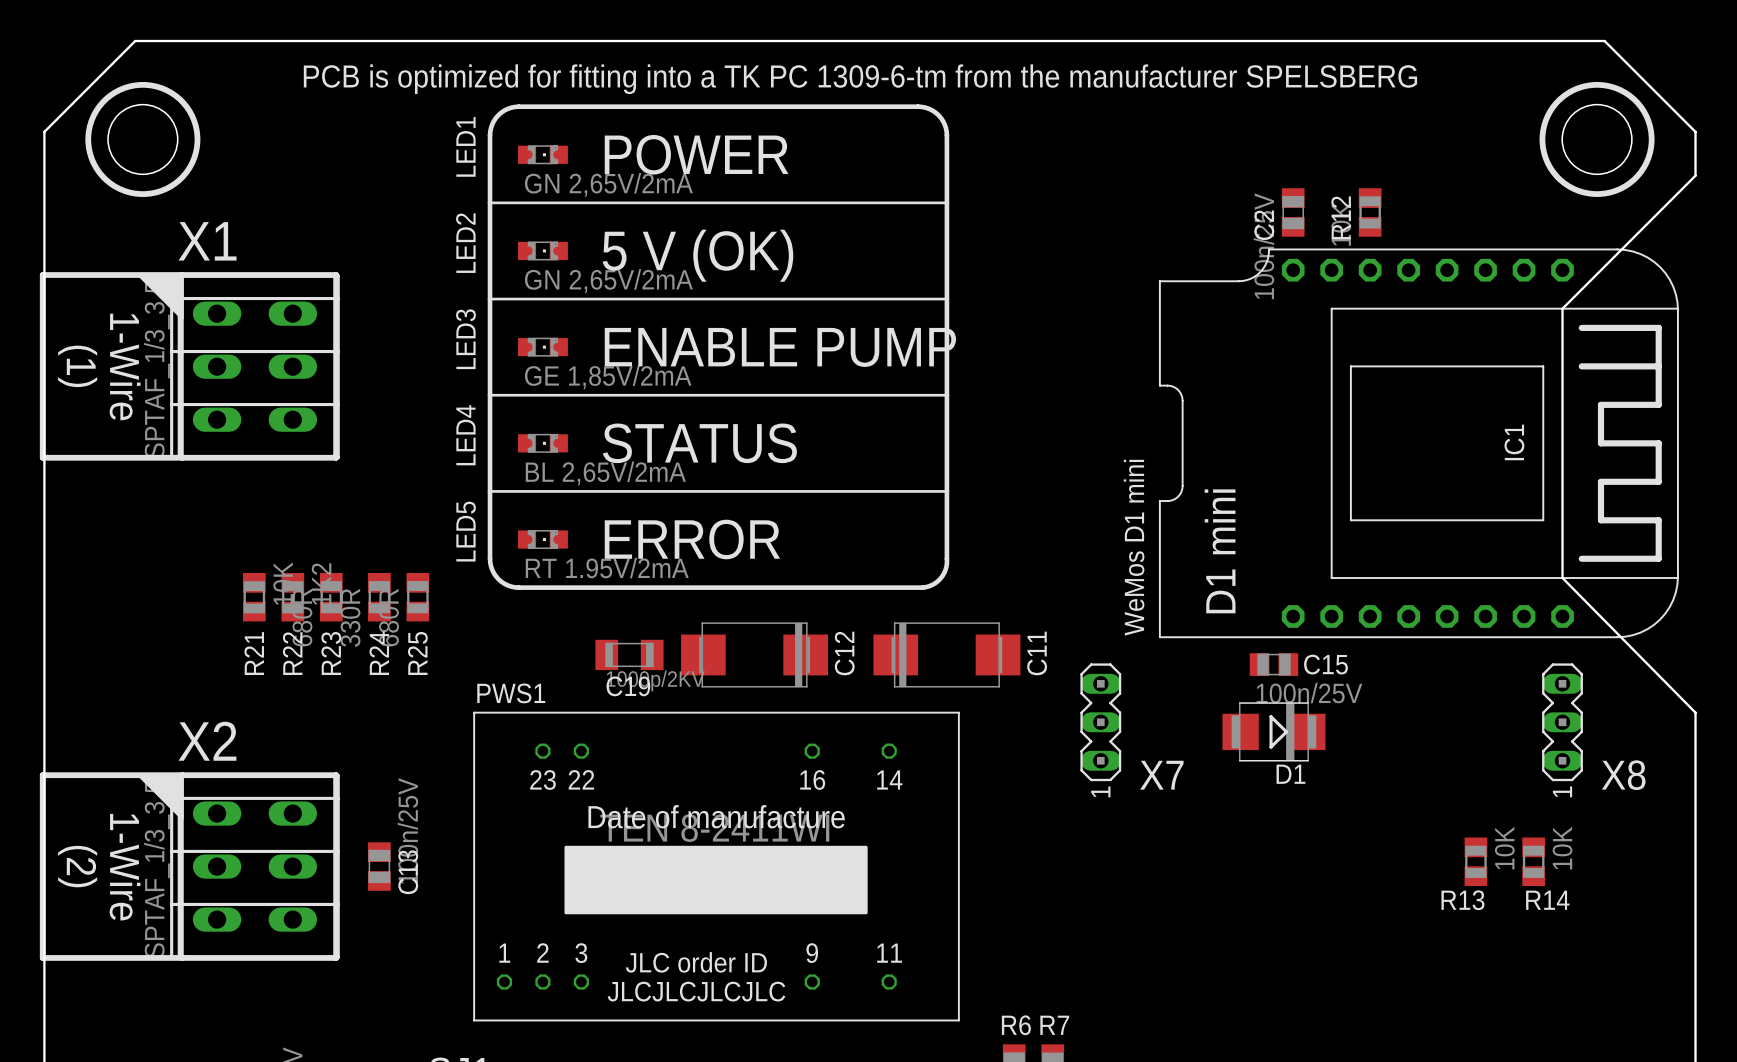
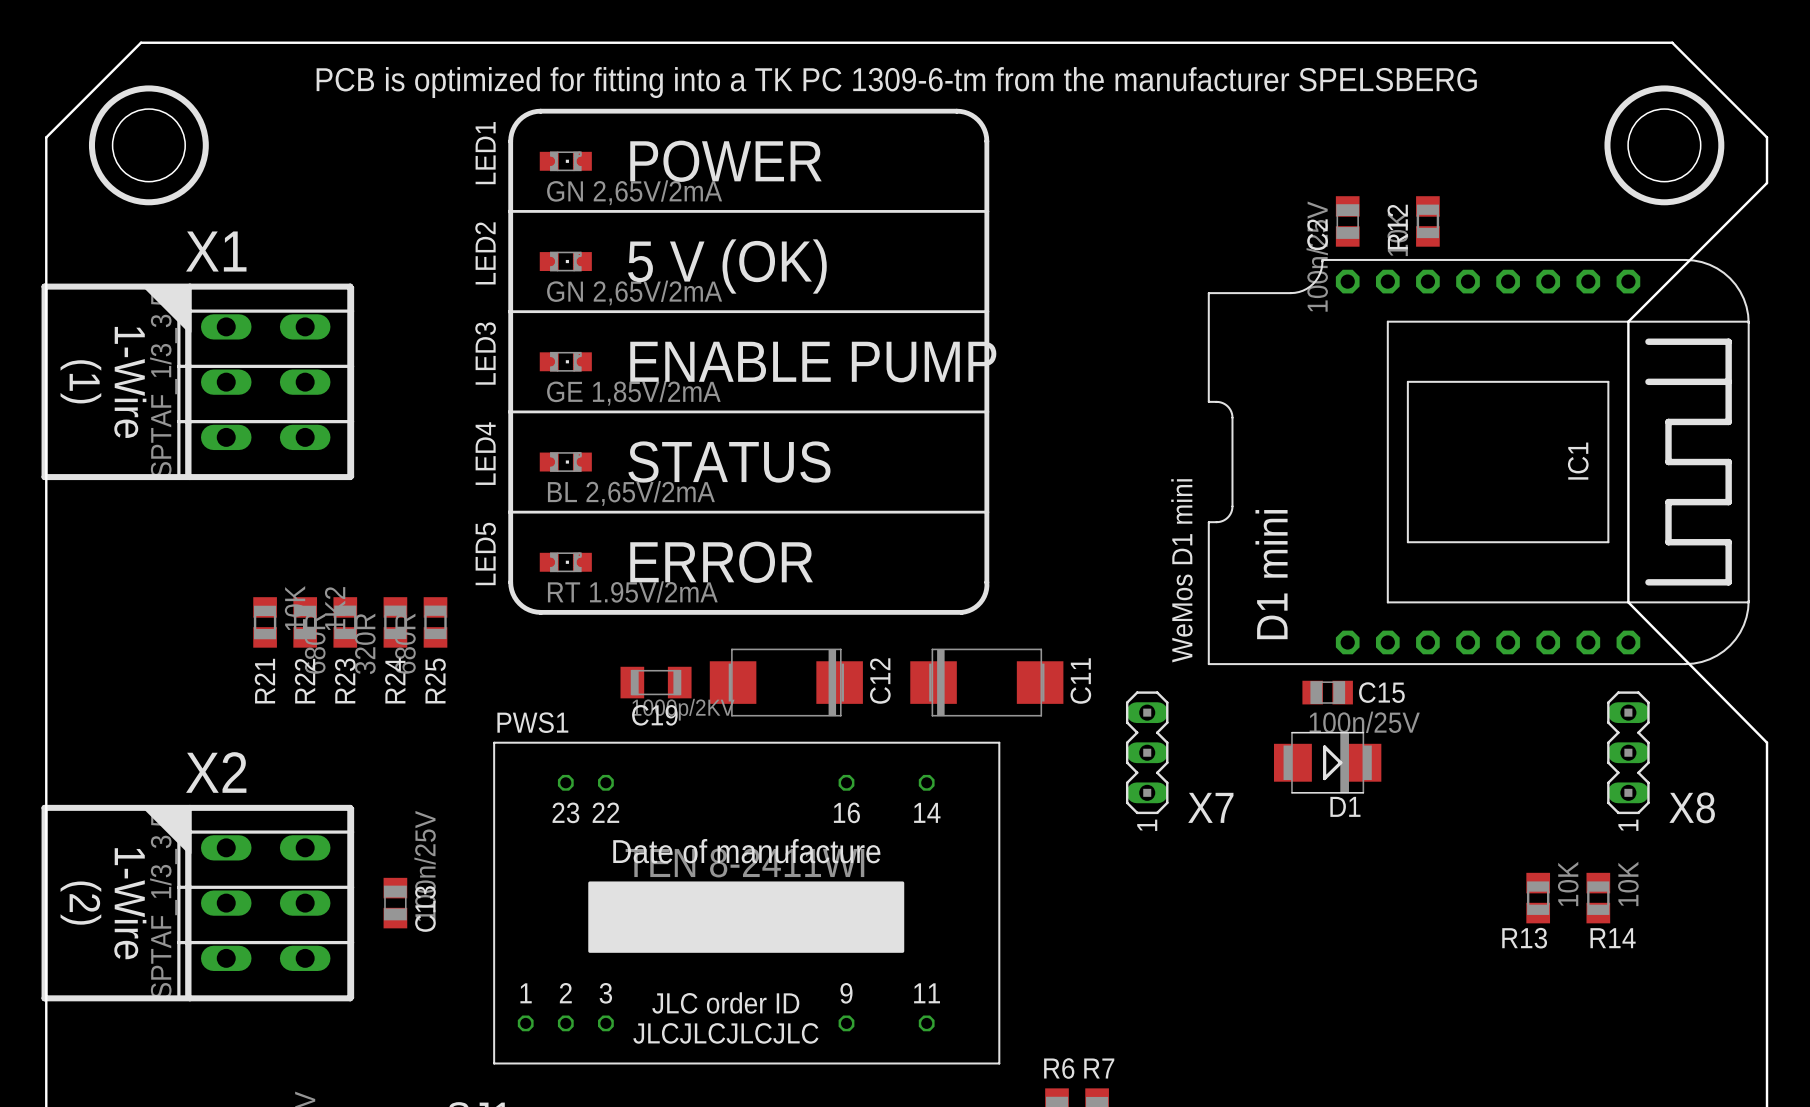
R24 value: 330R (350, 617) -> 320R (365, 643)

